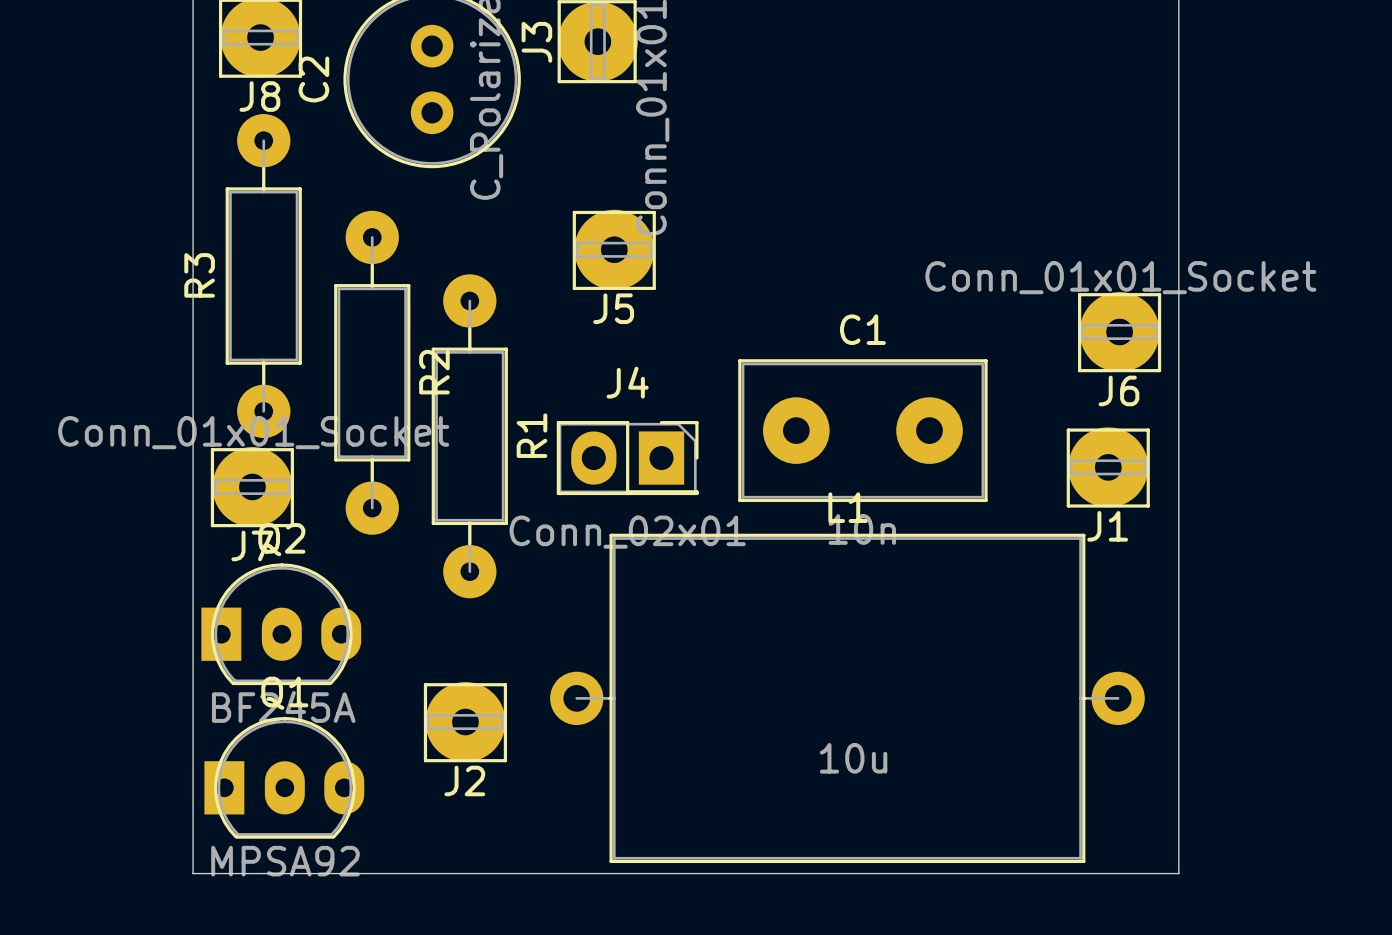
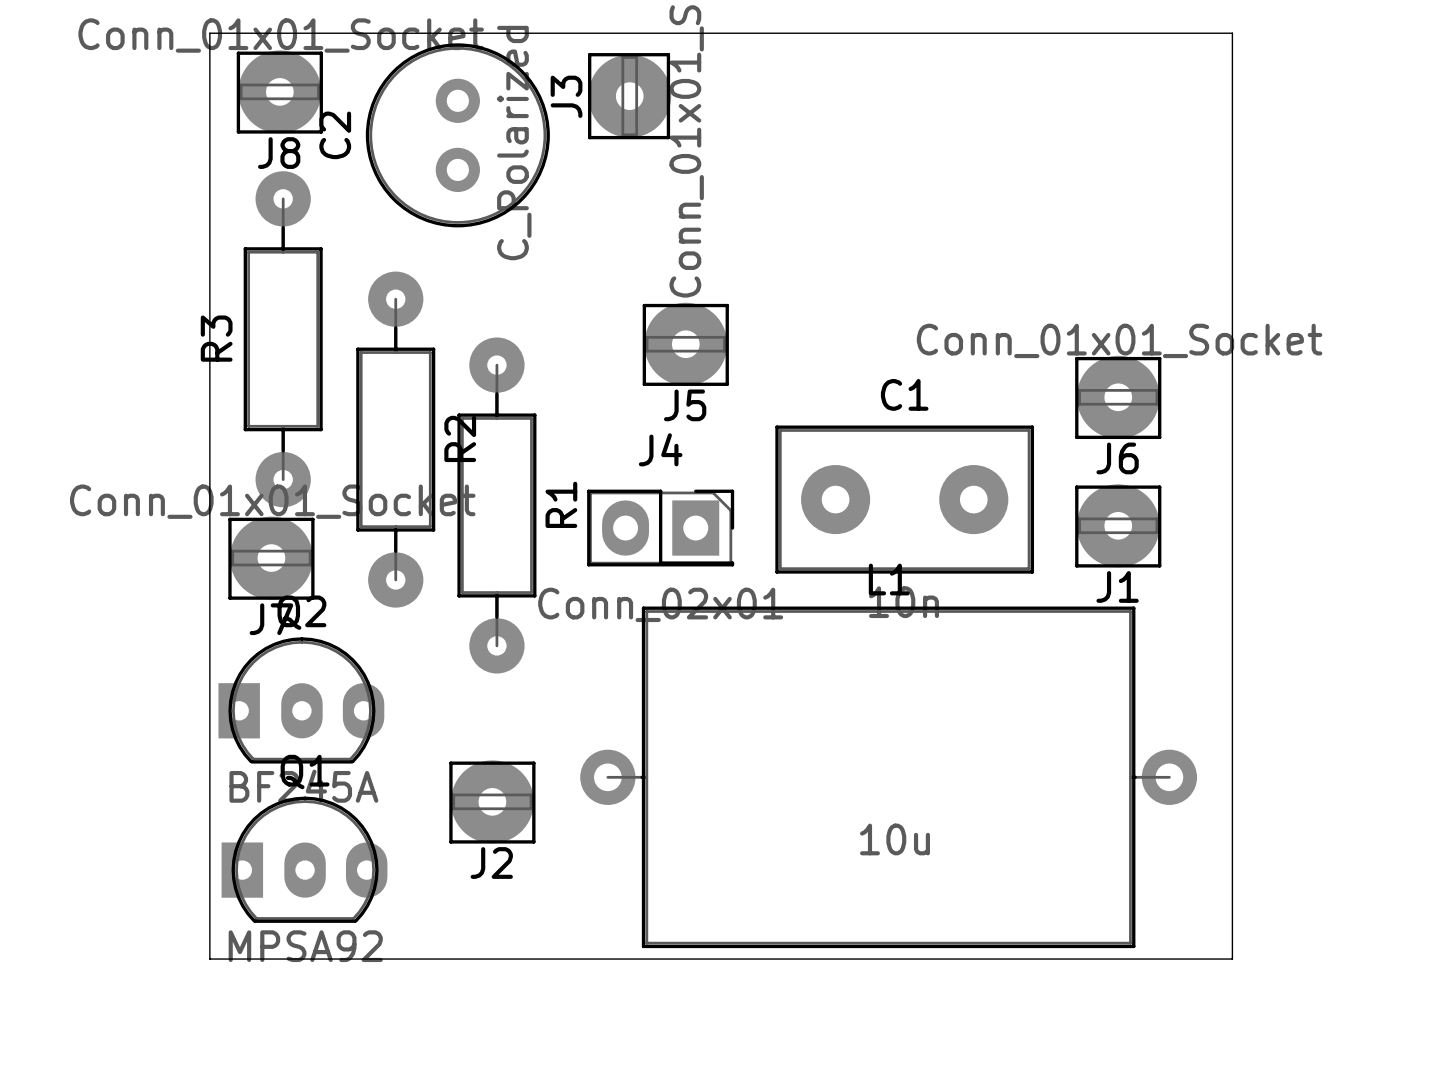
J5 position: (614, 249) -> (685, 344)
J6 position: (1119, 332) -> (1118, 397)
J1 position: (1108, 467) -> (1118, 525)

